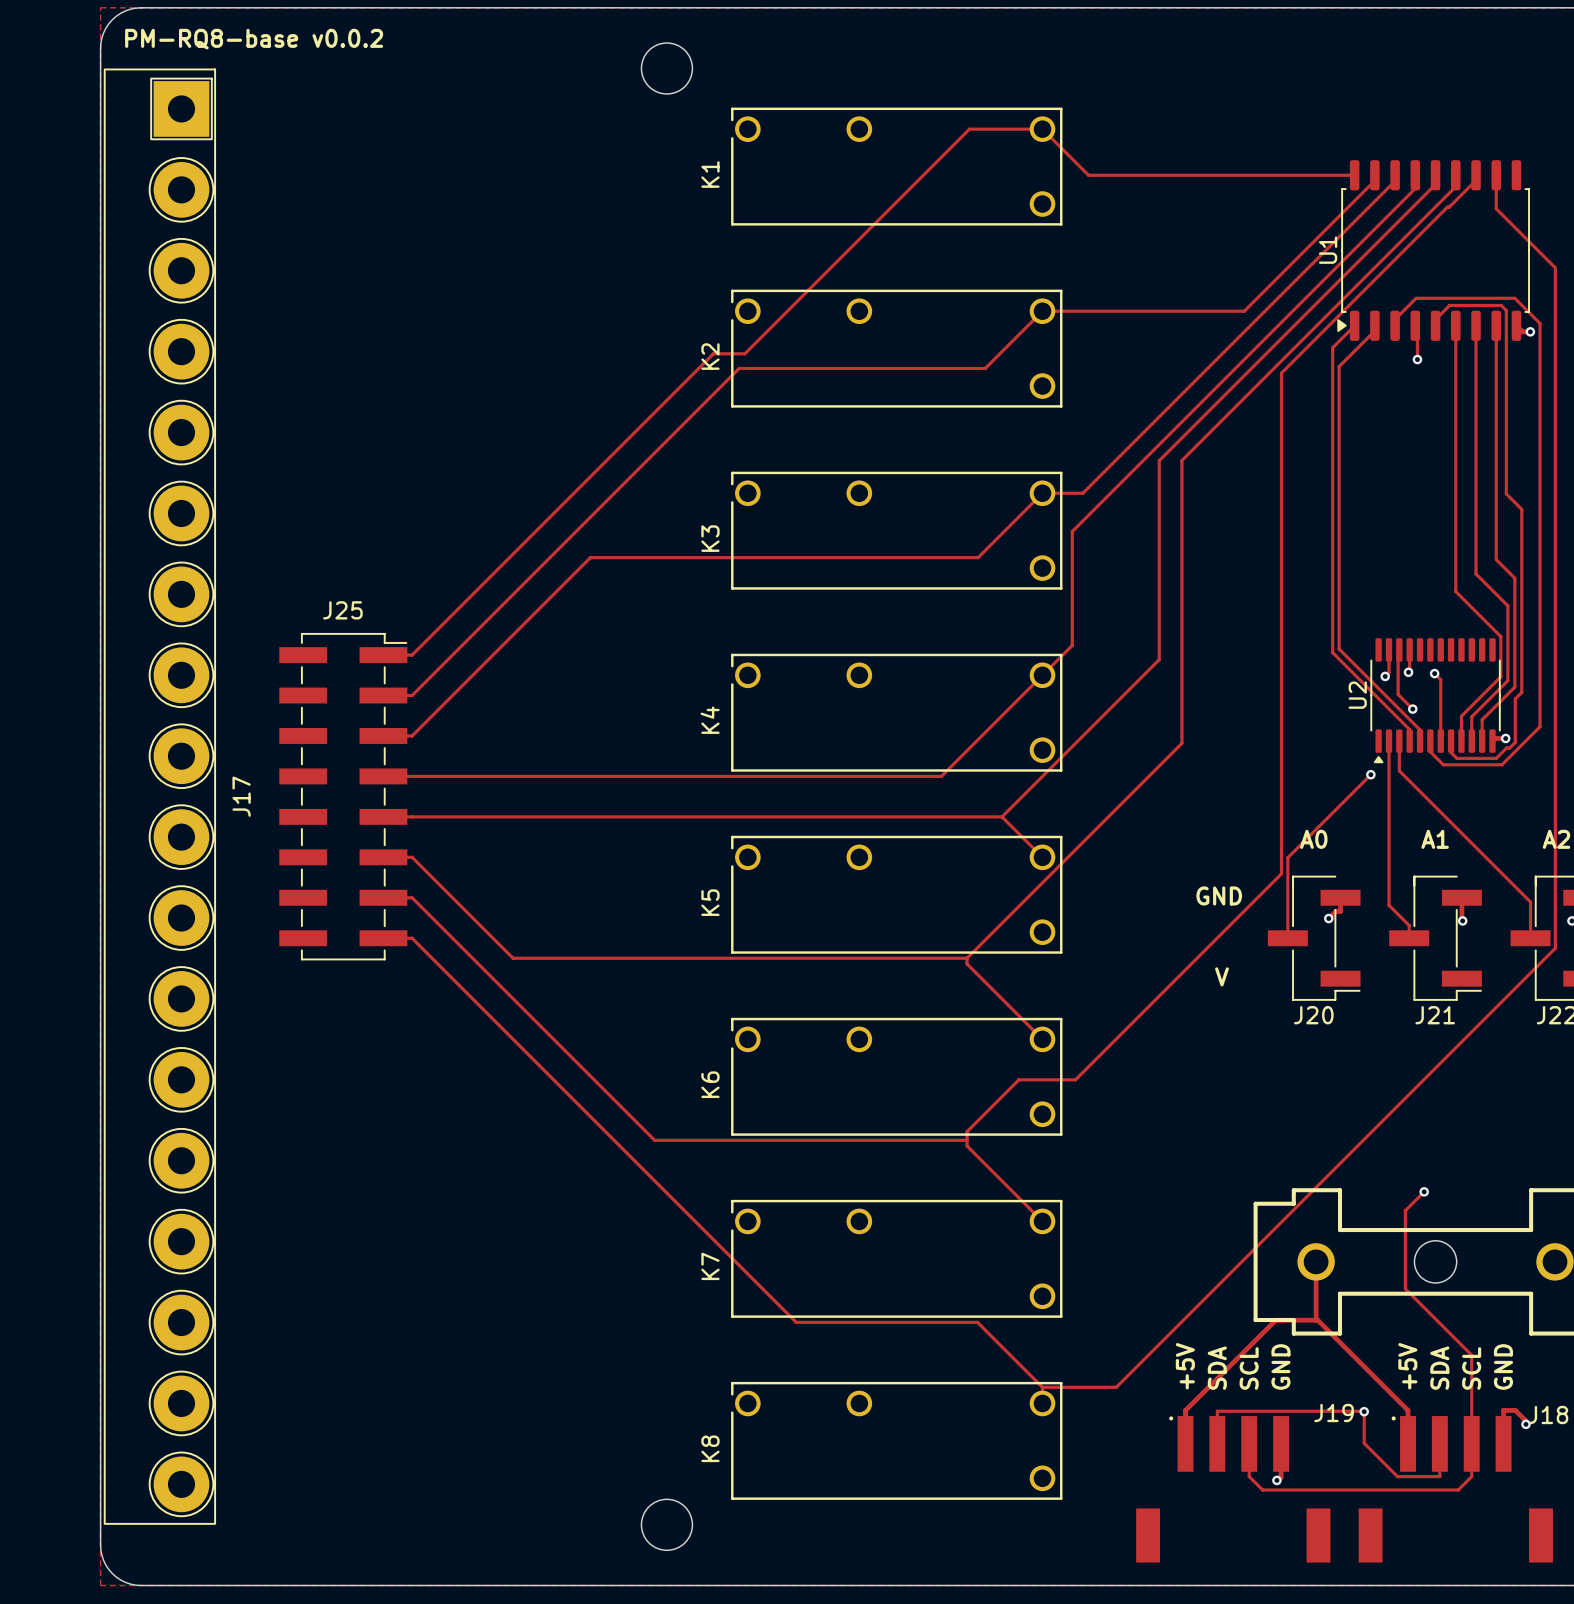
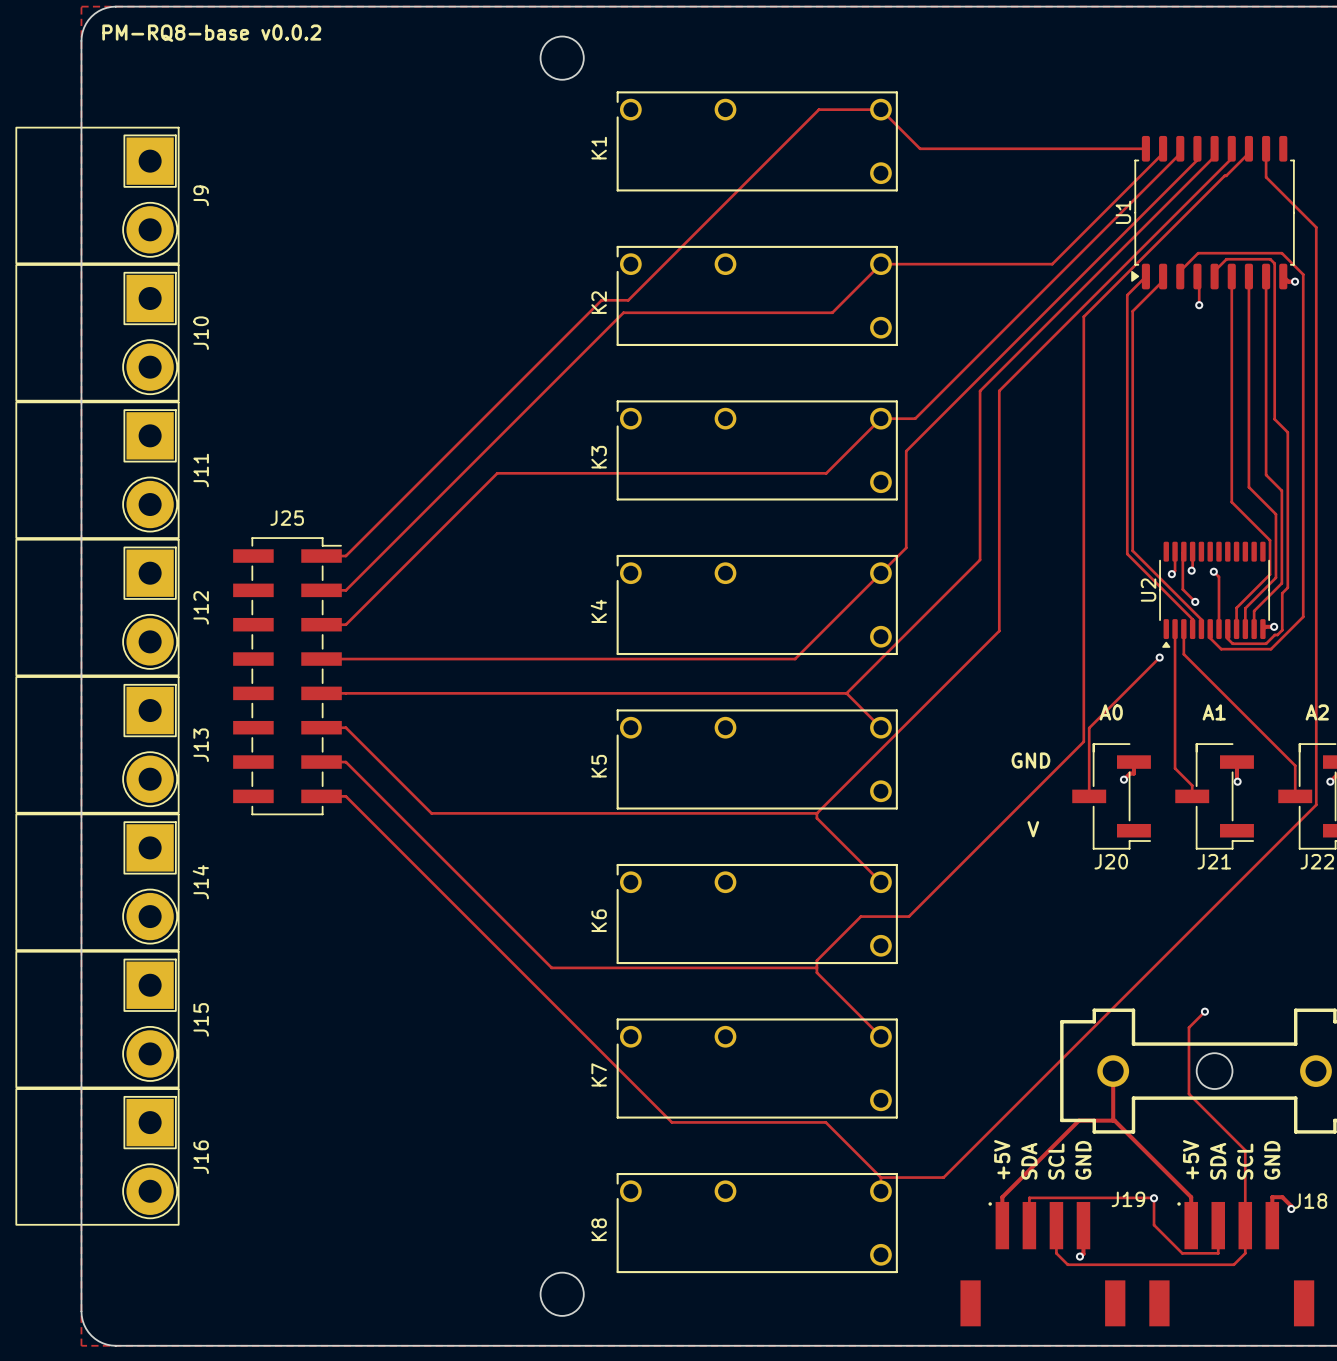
J9: none -> (97, 195)
J10: none -> (97, 332)
J11: none -> (97, 470)
J12: none -> (97, 607)
J17: (159, 796) -> none
J13: none -> (97, 744)
J14: none -> (97, 882)
J15: none -> (97, 1019)
J16: none -> (97, 1156)

